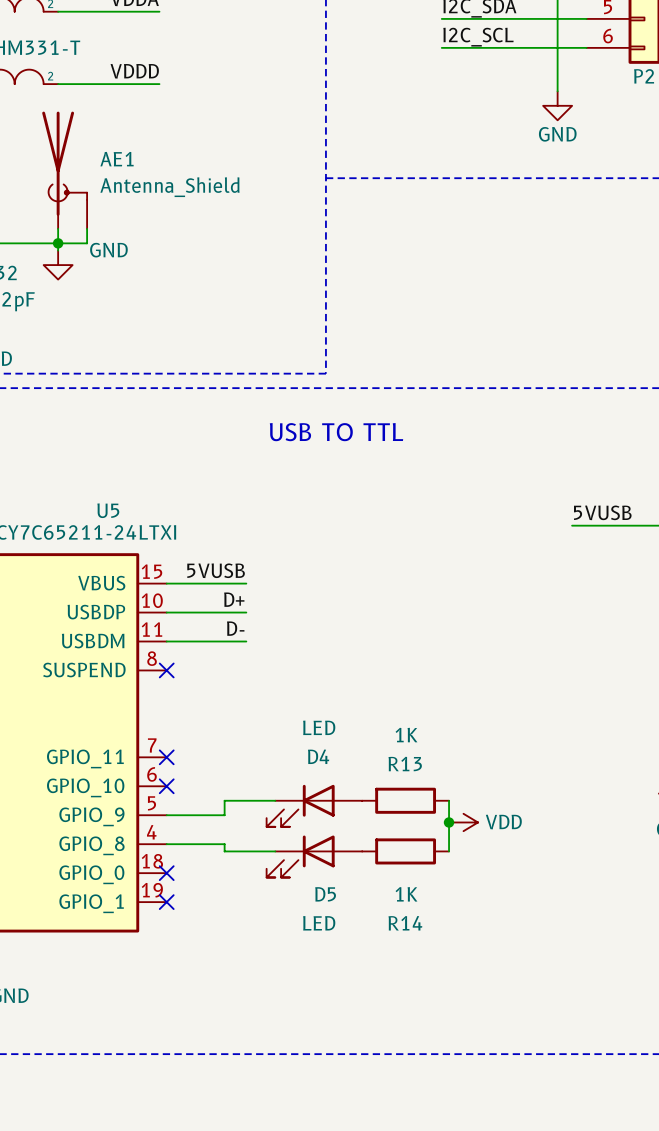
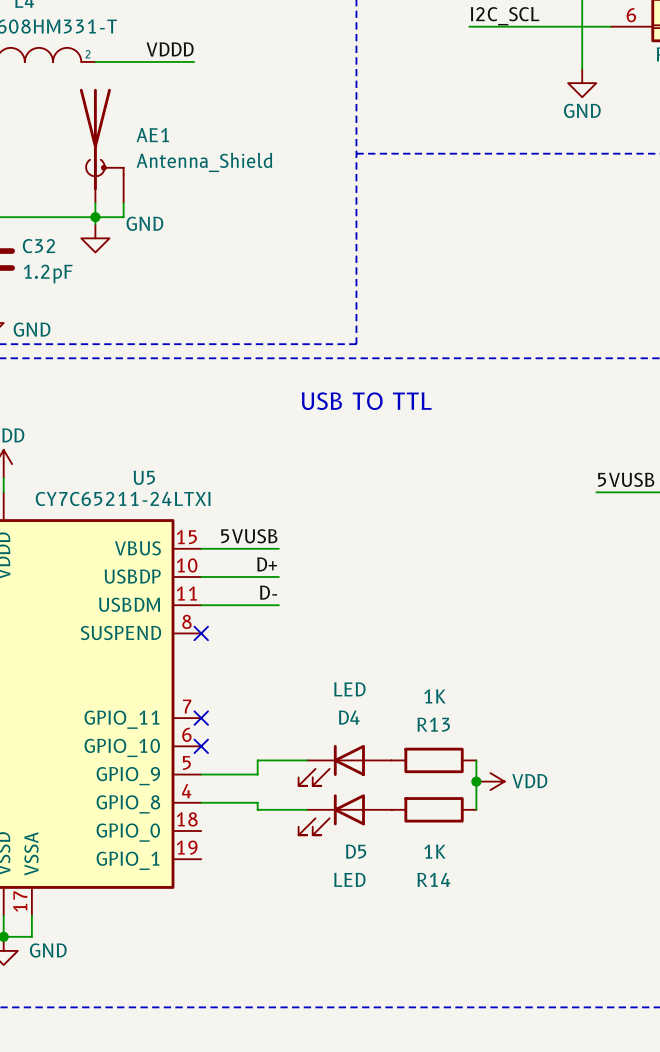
no-connect mark: (166, 873) -> none
no-connect mark: (166, 902) -> none

